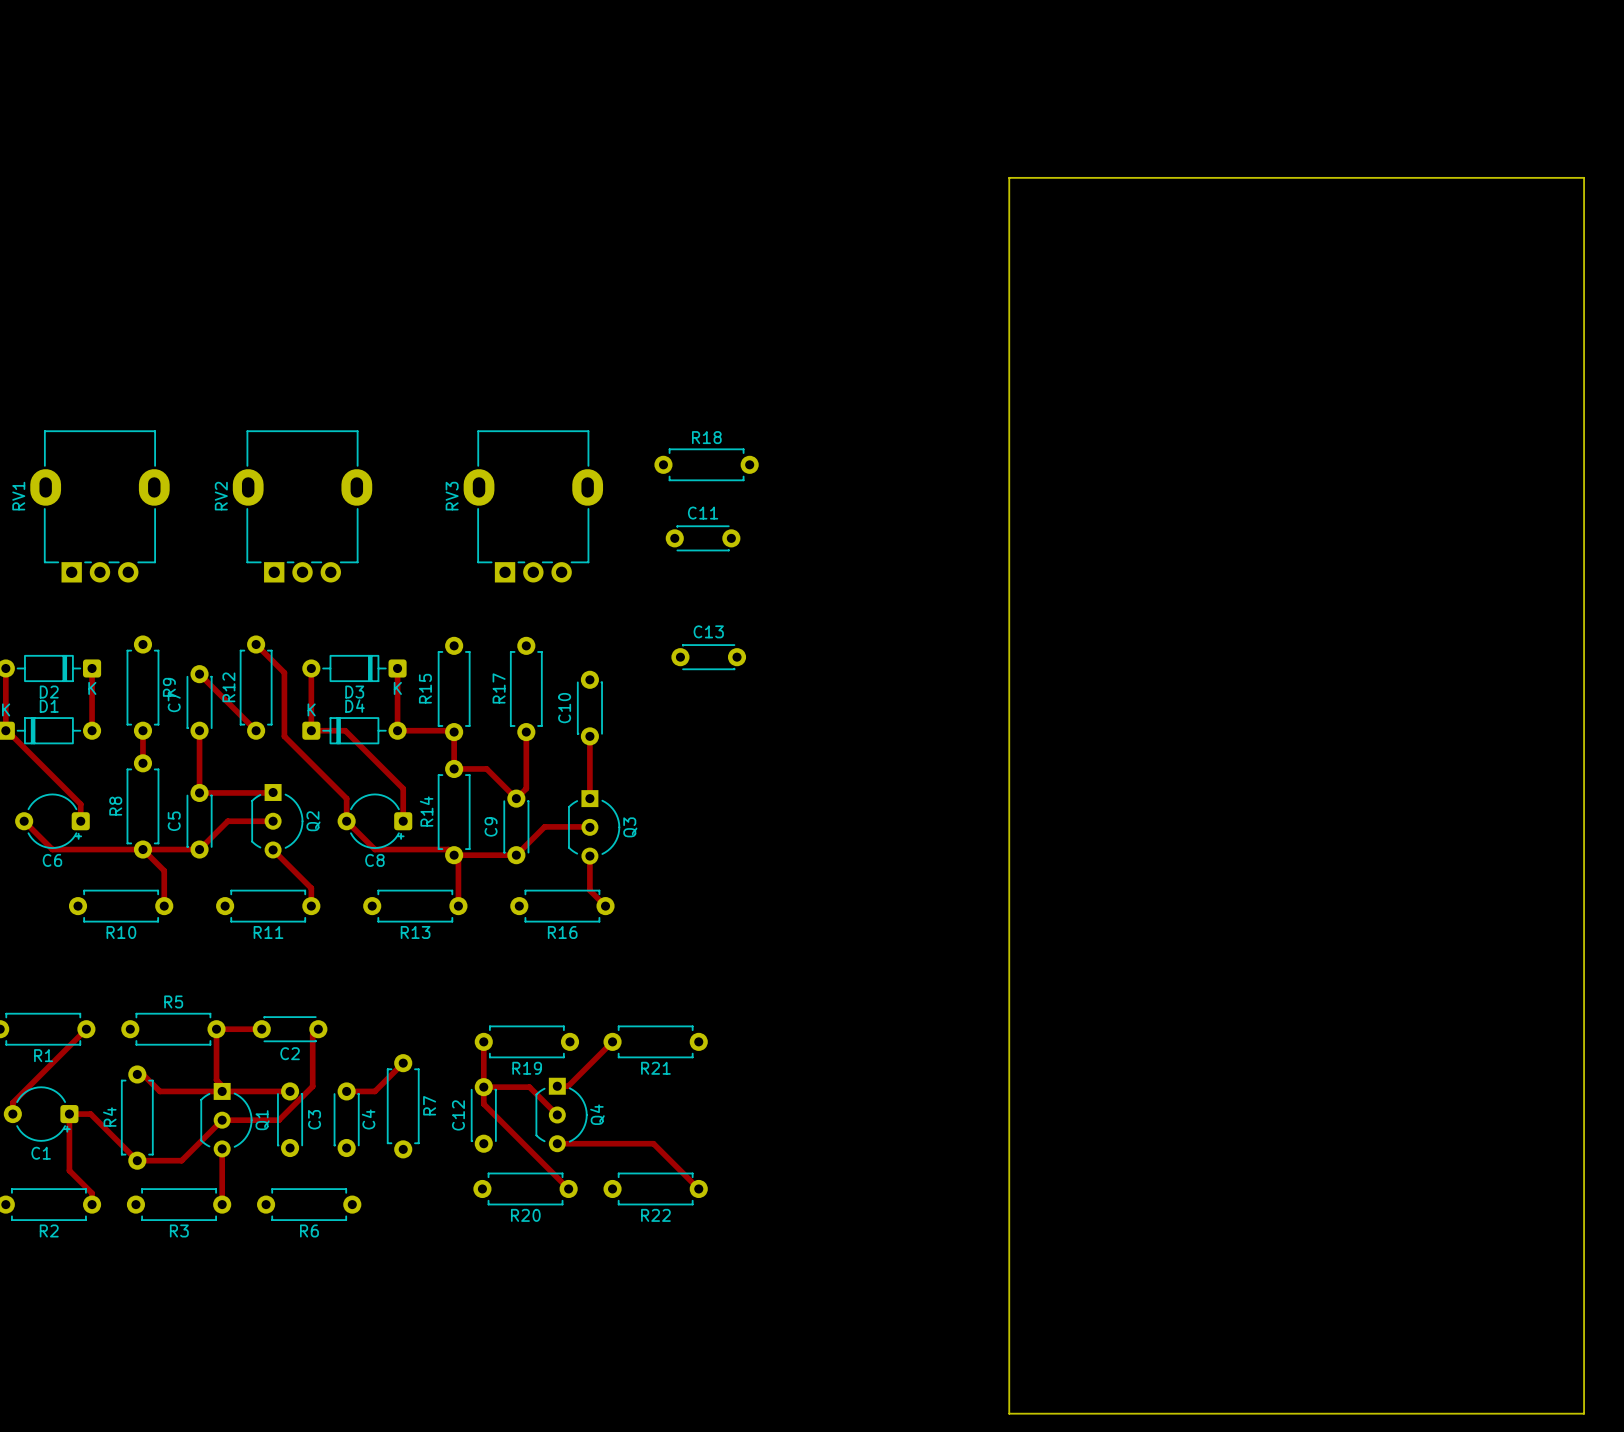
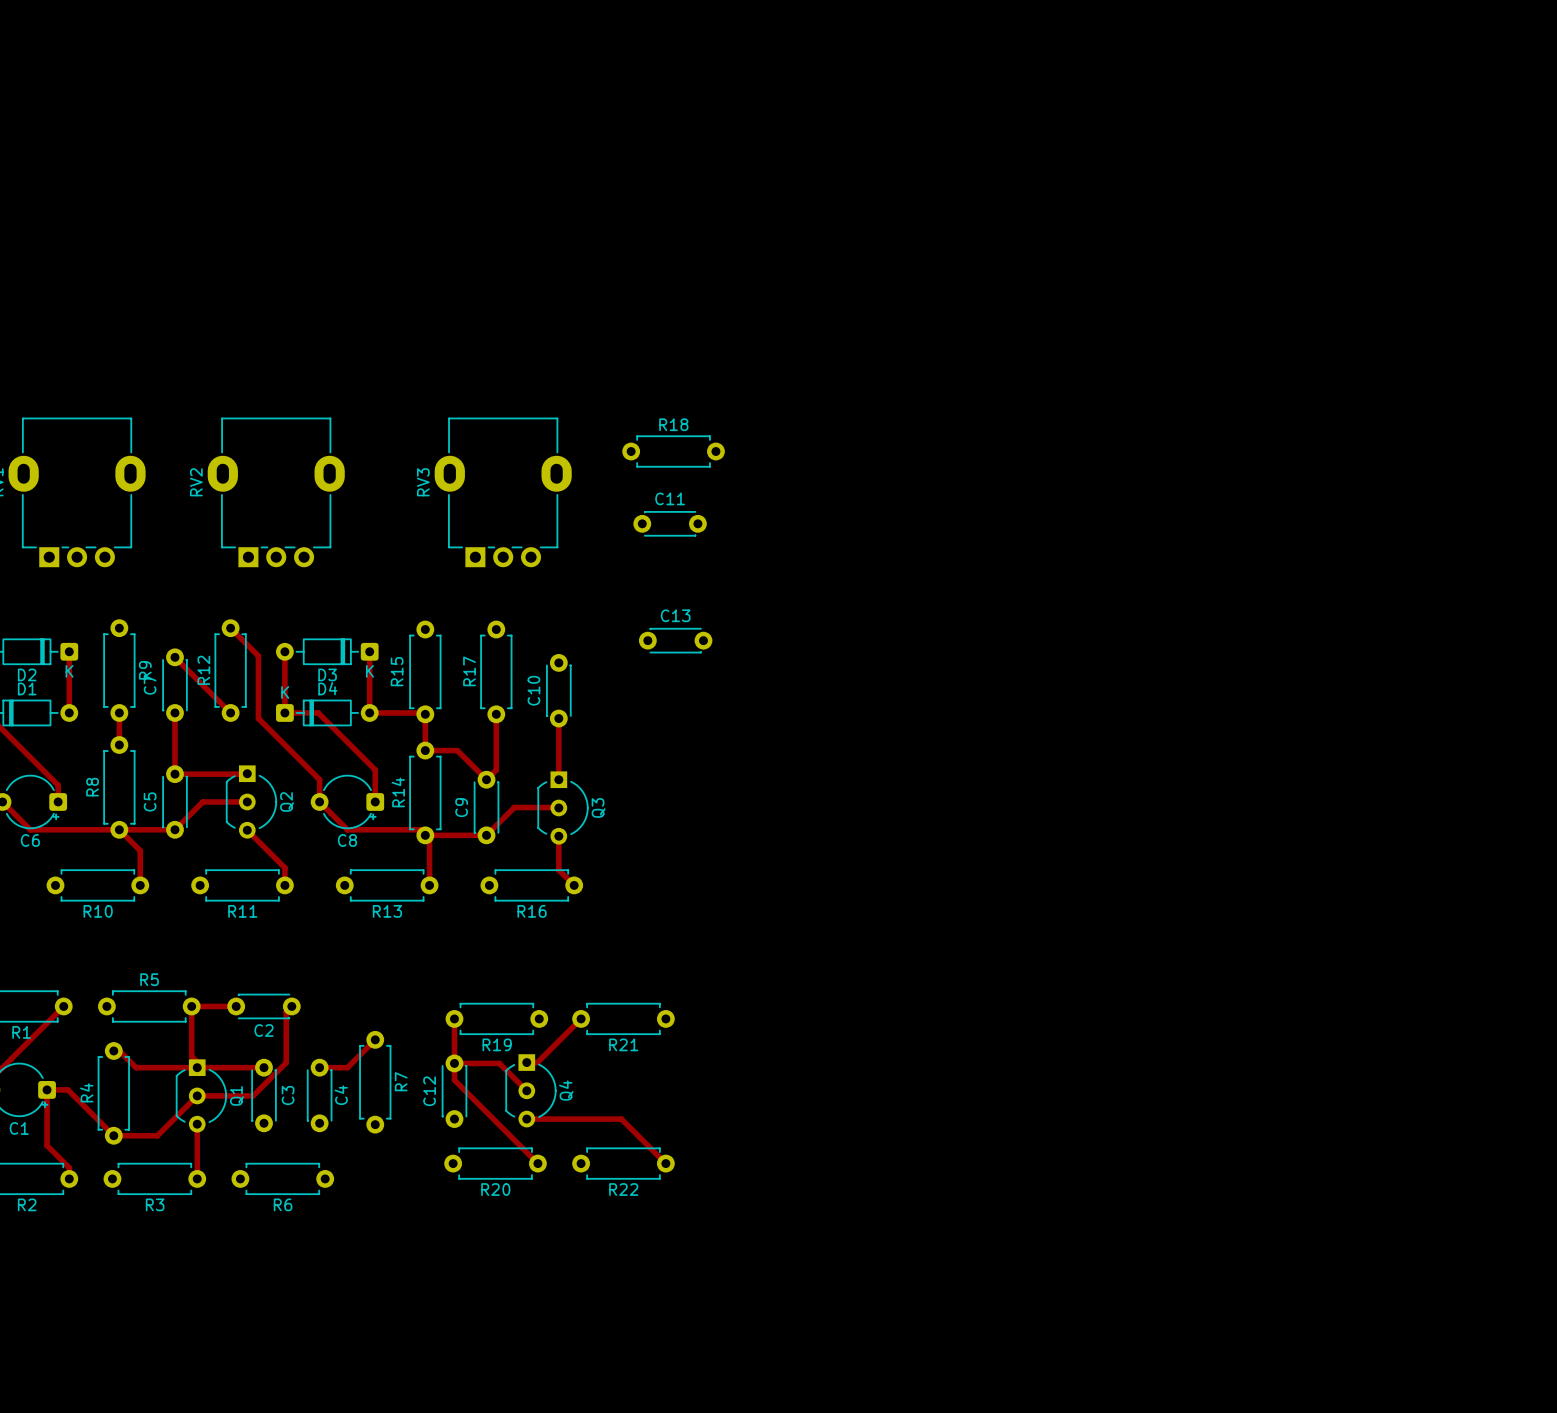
board edge: (1009, 177) (1584, 177) (1584, 1413) (1009, 1413) (1009, 177) -> none

